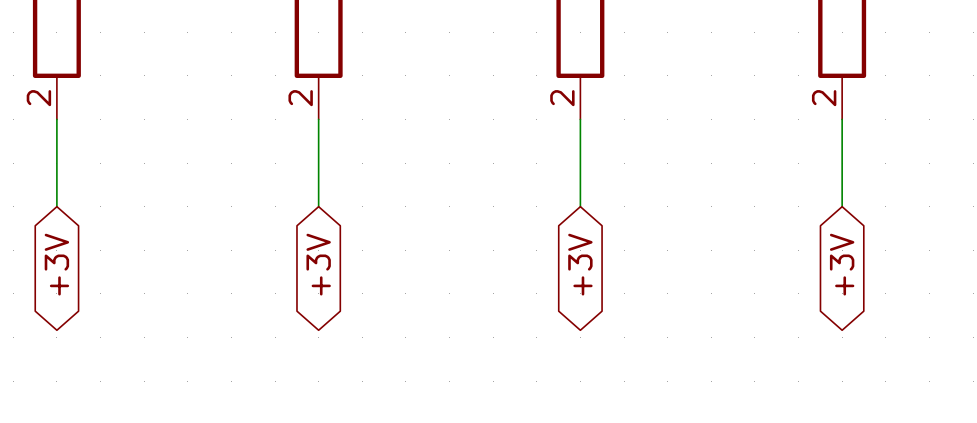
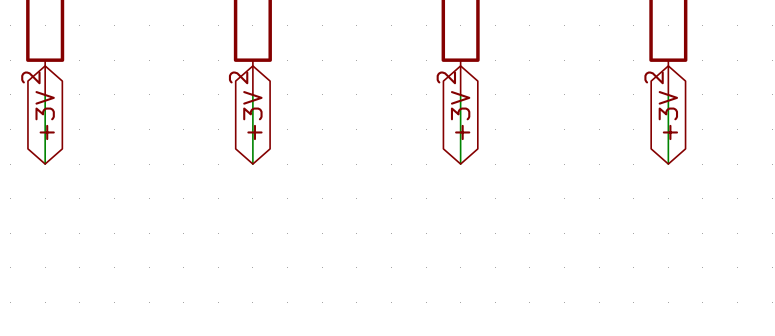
global label rotation: 0° (56, 264) -> 180° (45, 115)
global label rotation: 0° (318, 264) -> 180° (252, 115)
global label rotation: 0° (580, 264) -> 180° (460, 115)
global label rotation: 0° (842, 264) -> 180° (668, 115)

